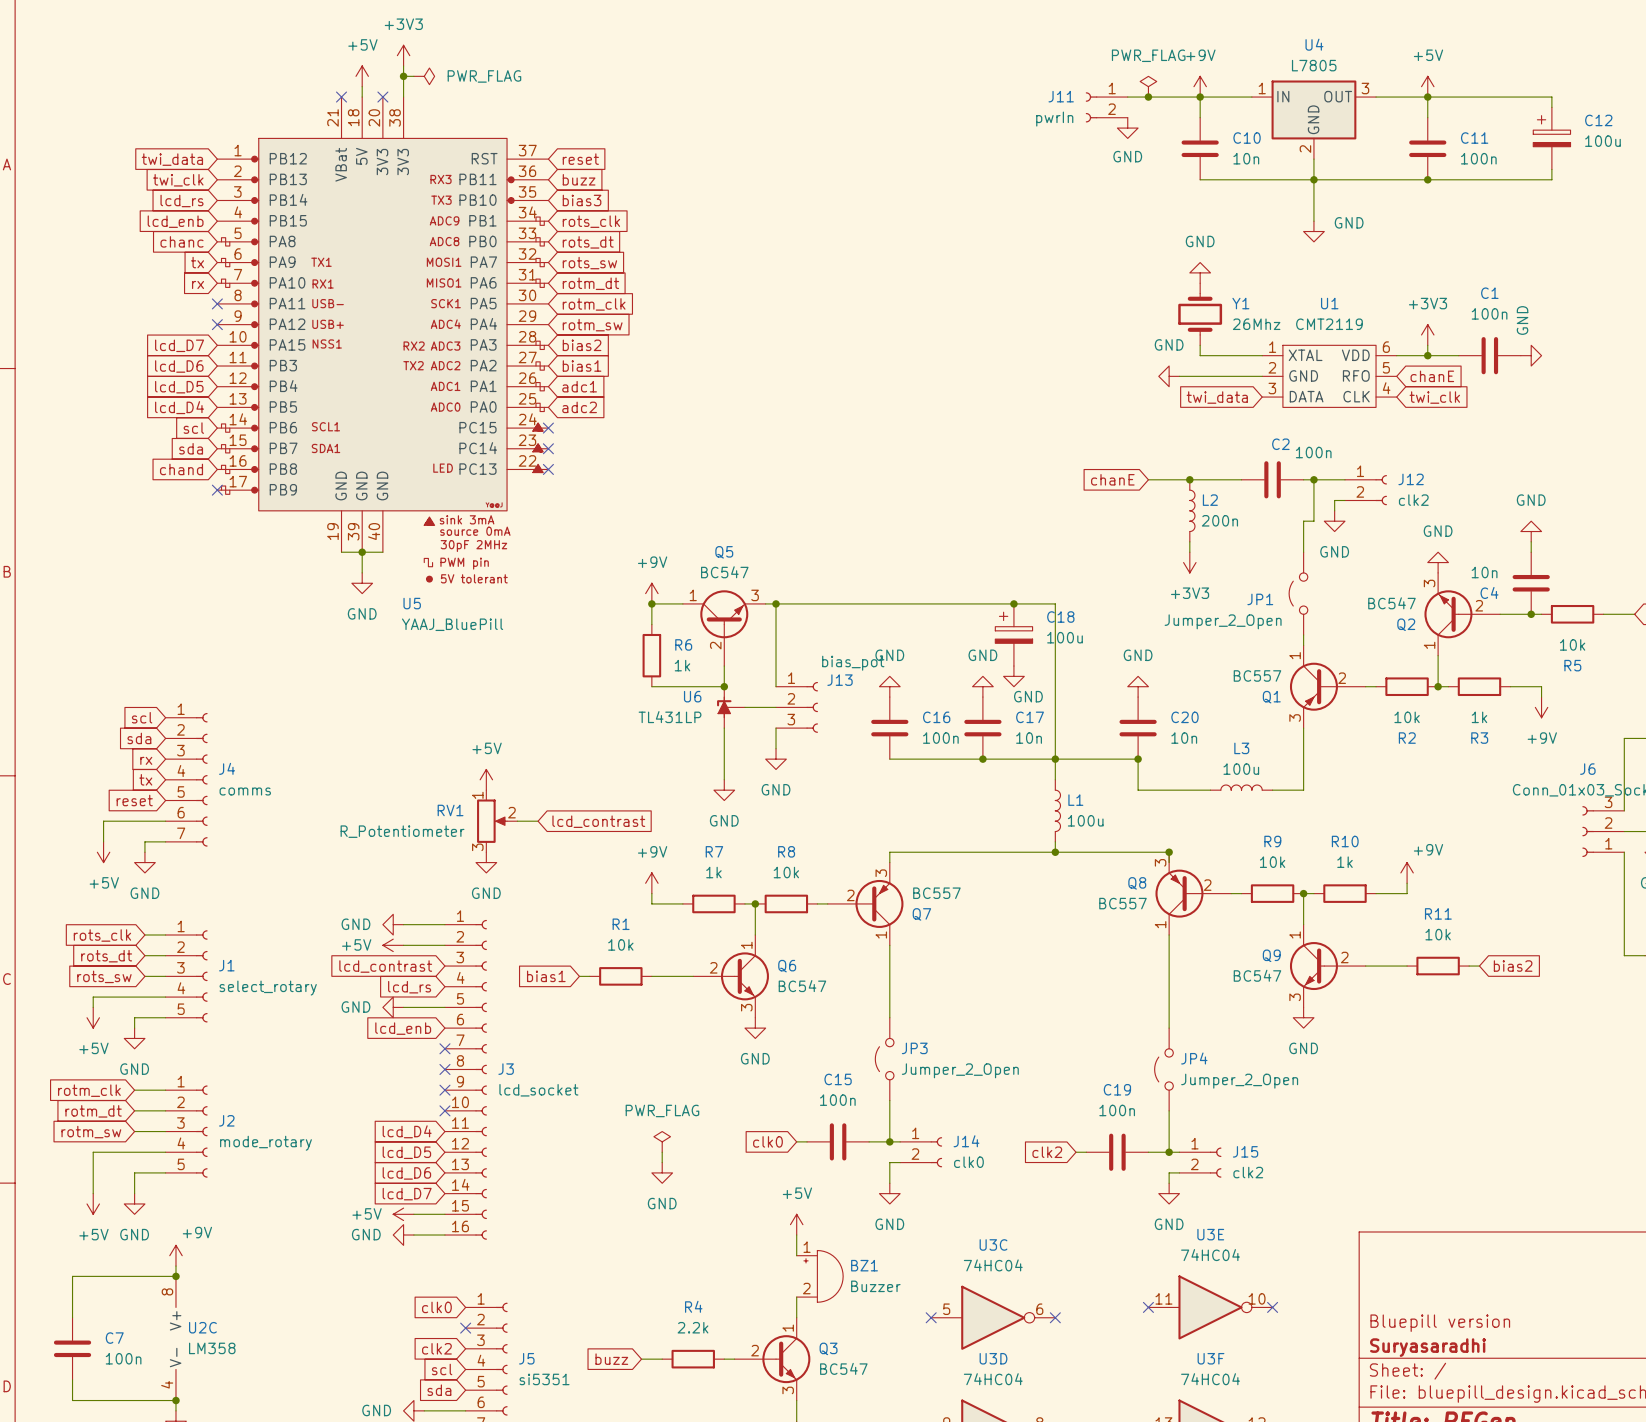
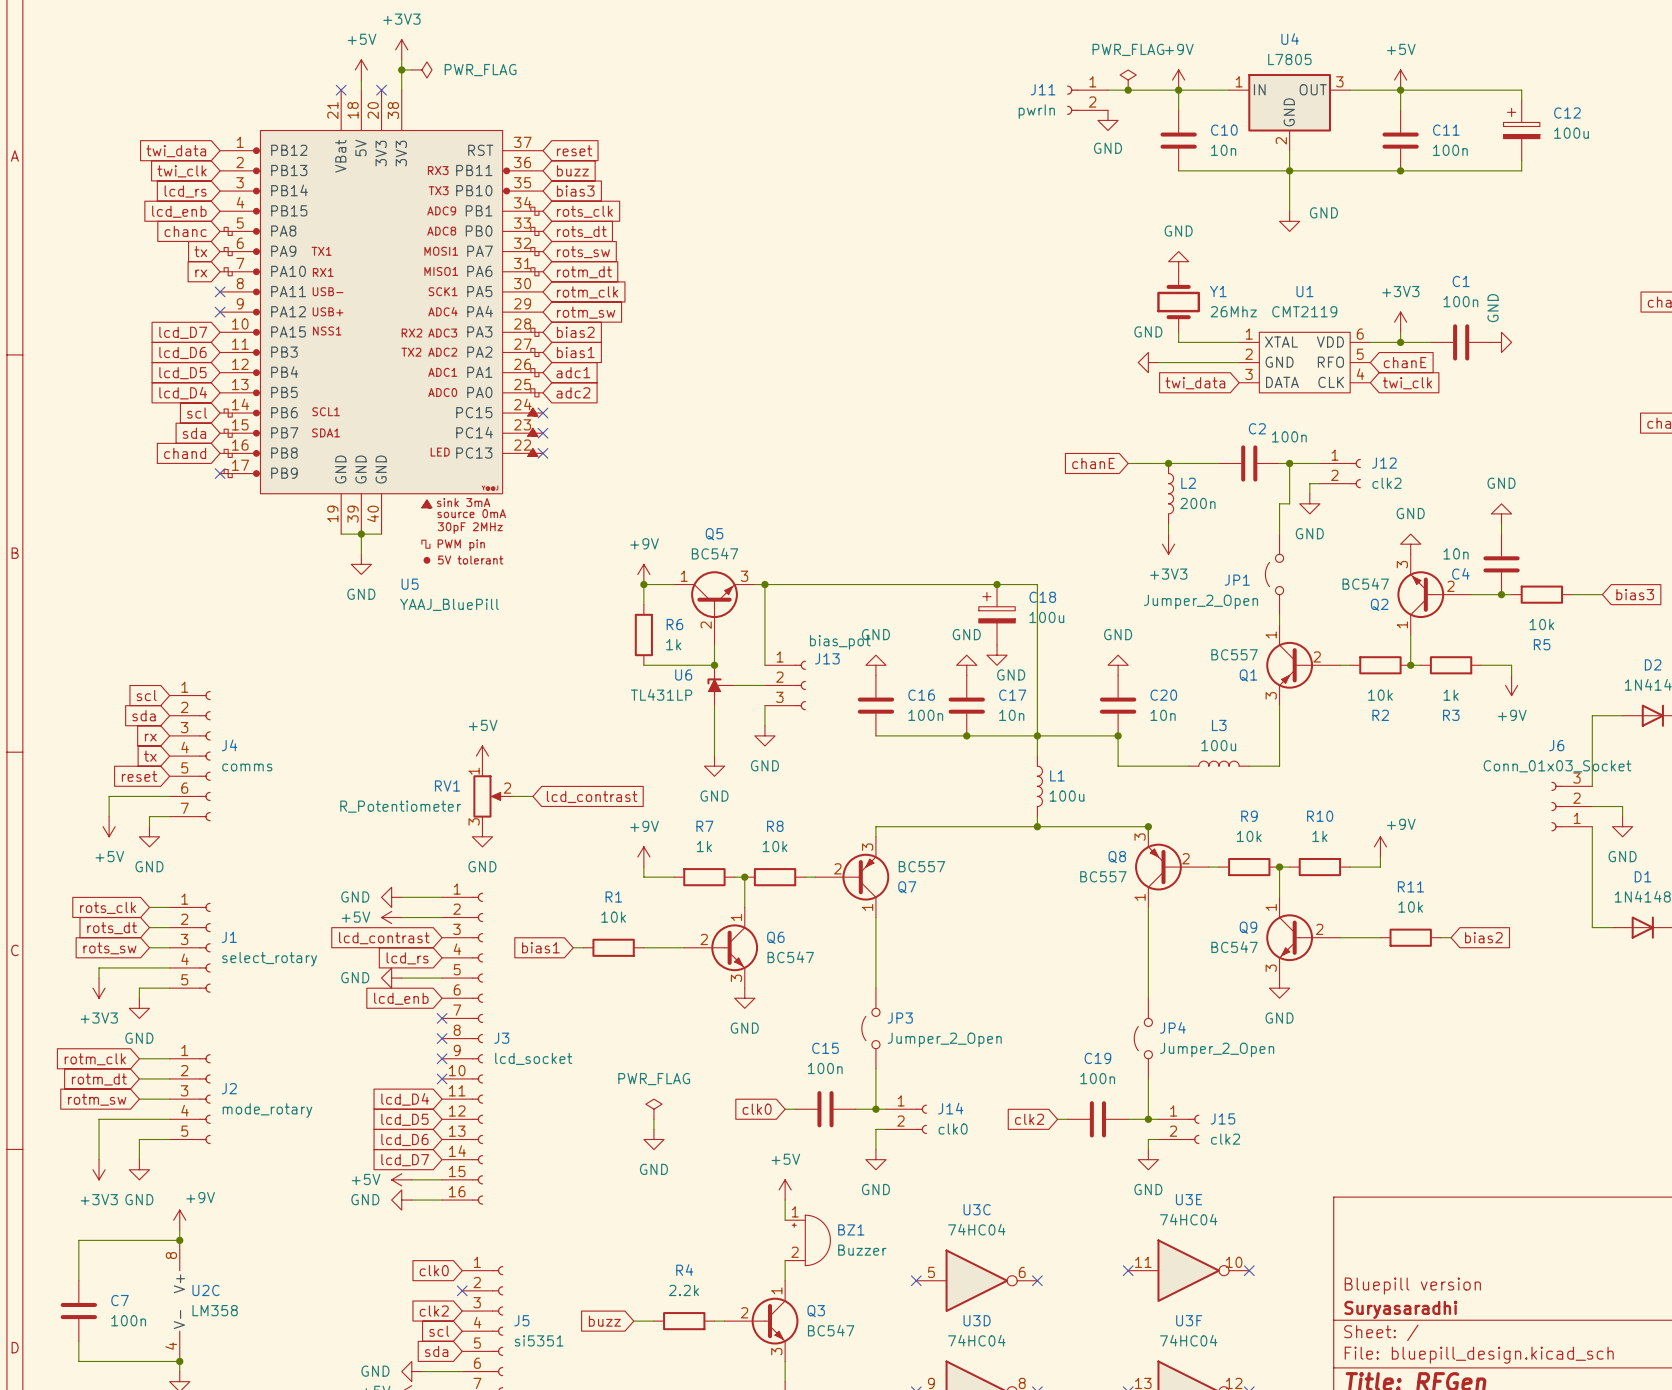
power symbol: +5V (93, 1017) -> +3V3 (99, 988)
power symbol: +5V (93, 1203) -> +3V3 (99, 1169)

